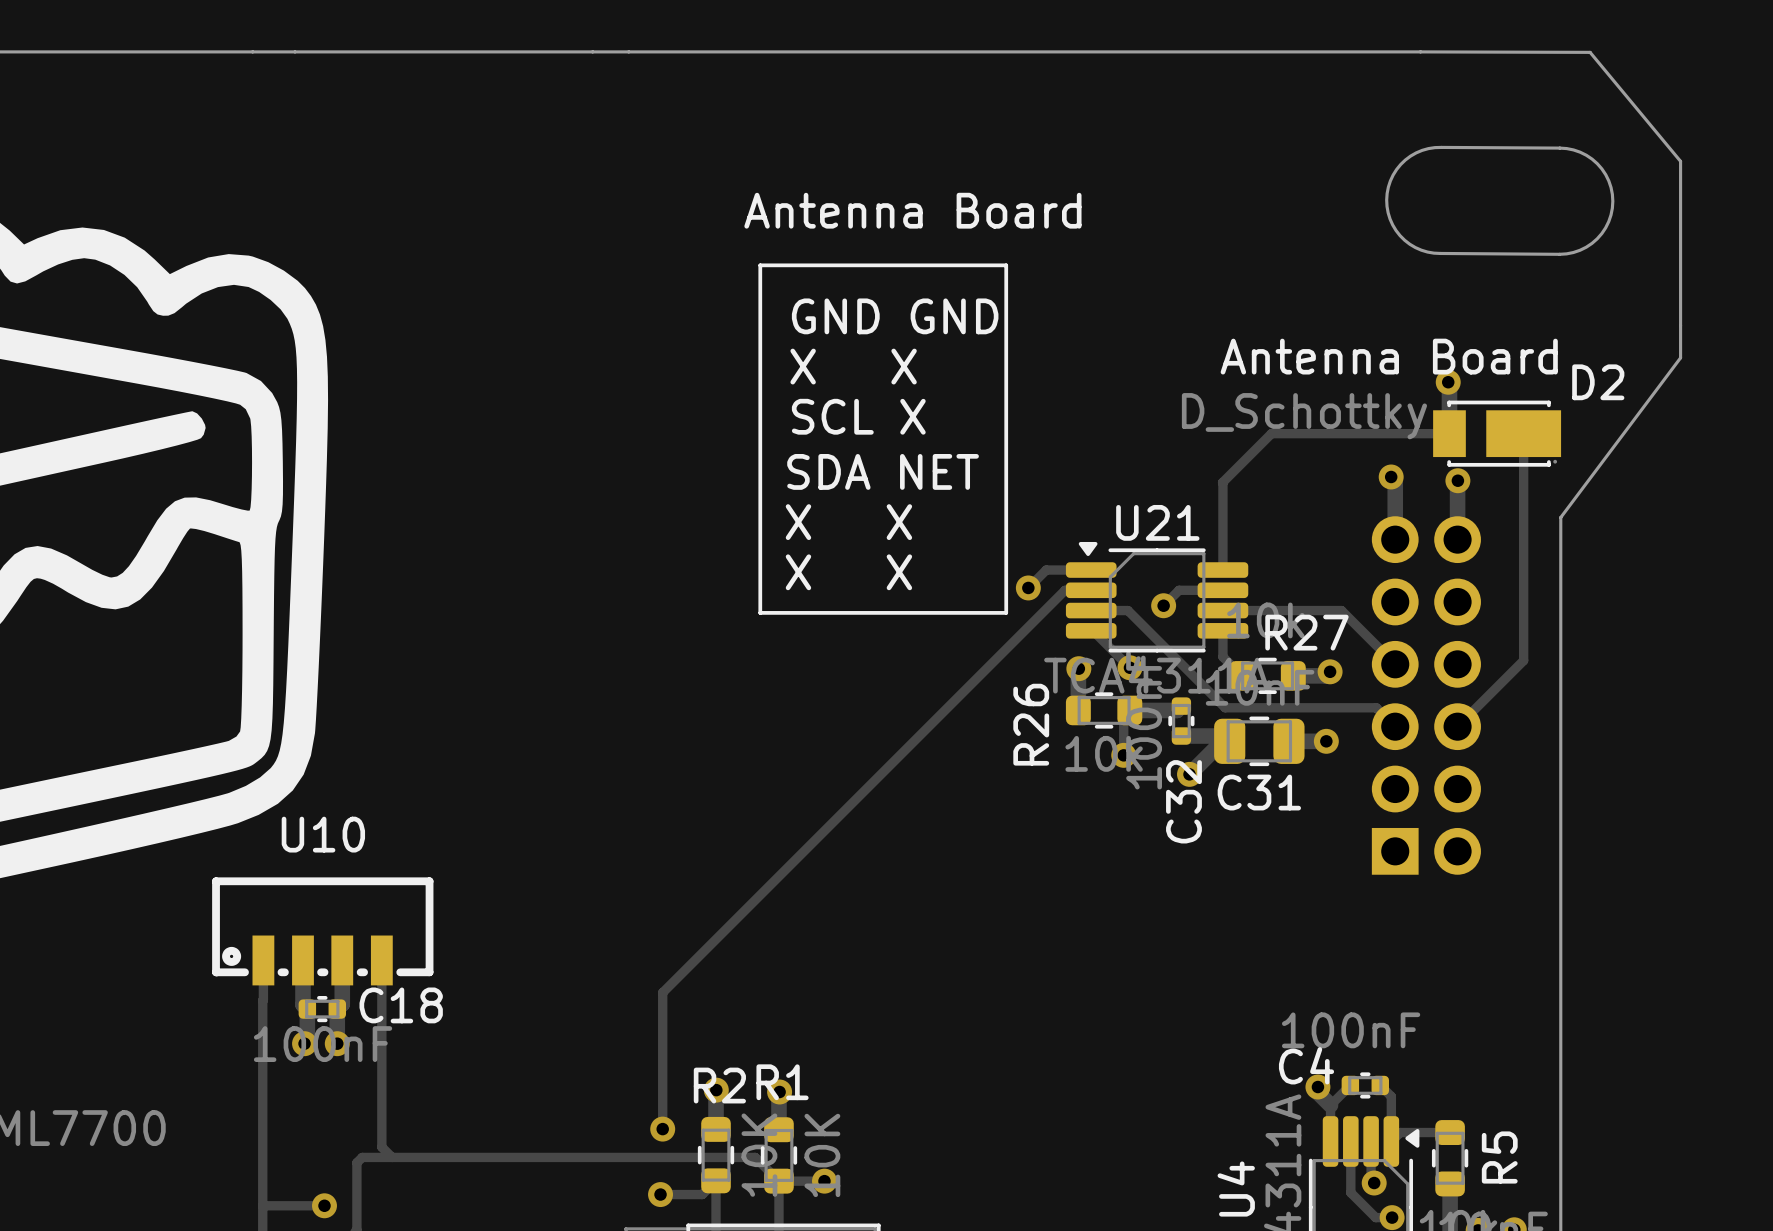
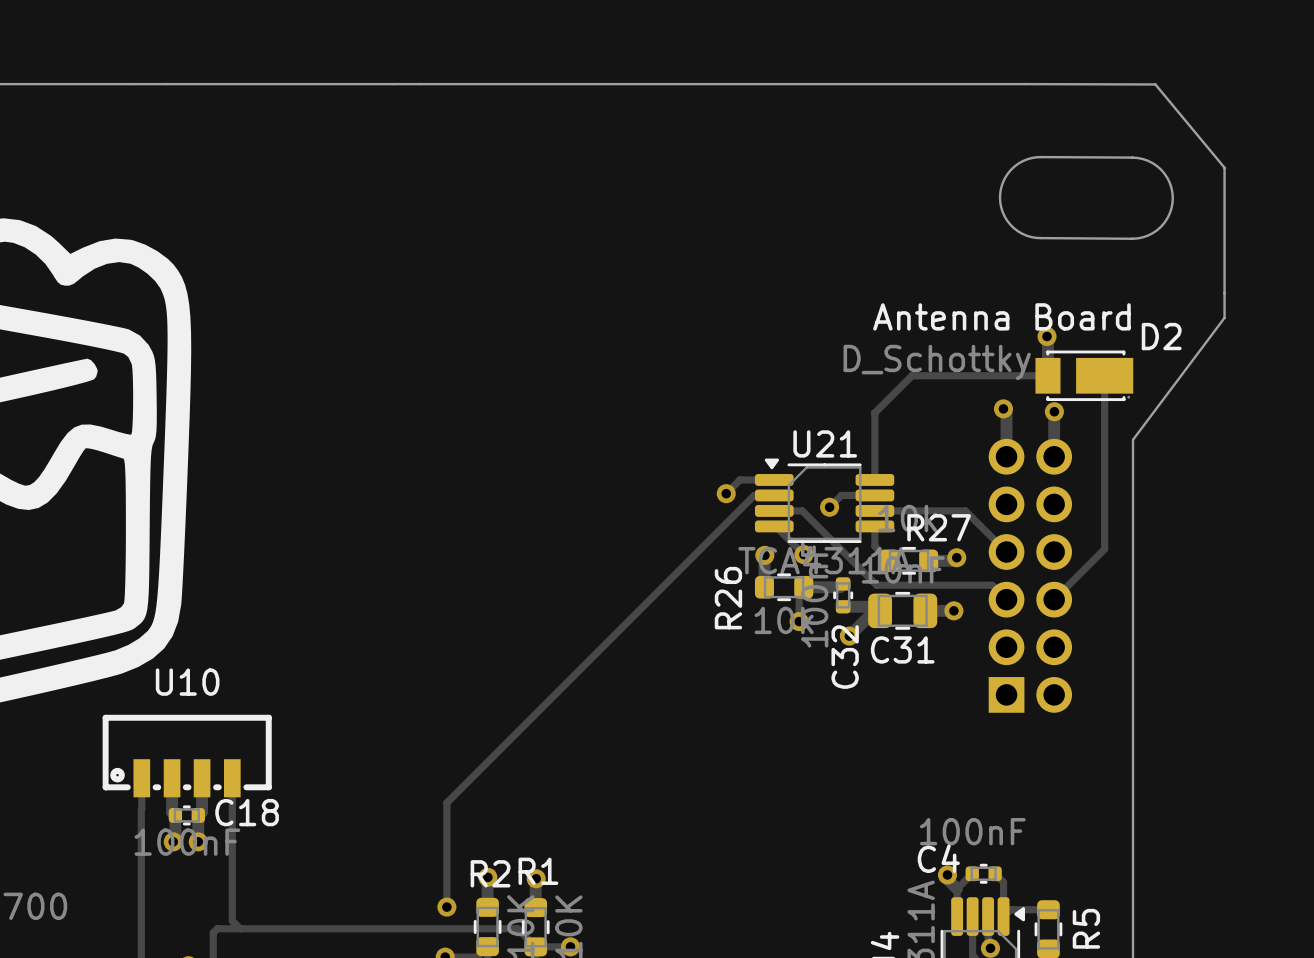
text: Antenna Board (912, 210) -> none
line: (760, 265) (1006, 265) (1006, 612) (760, 612) (760, 265) -> none
text: GND GND (895, 316) -> none
text: X X (853, 366) -> none
text: SCL X (858, 416) -> none
text: SDA NET (883, 471) -> none
text: X X (848, 522) -> none
text: X X (848, 572) -> none

